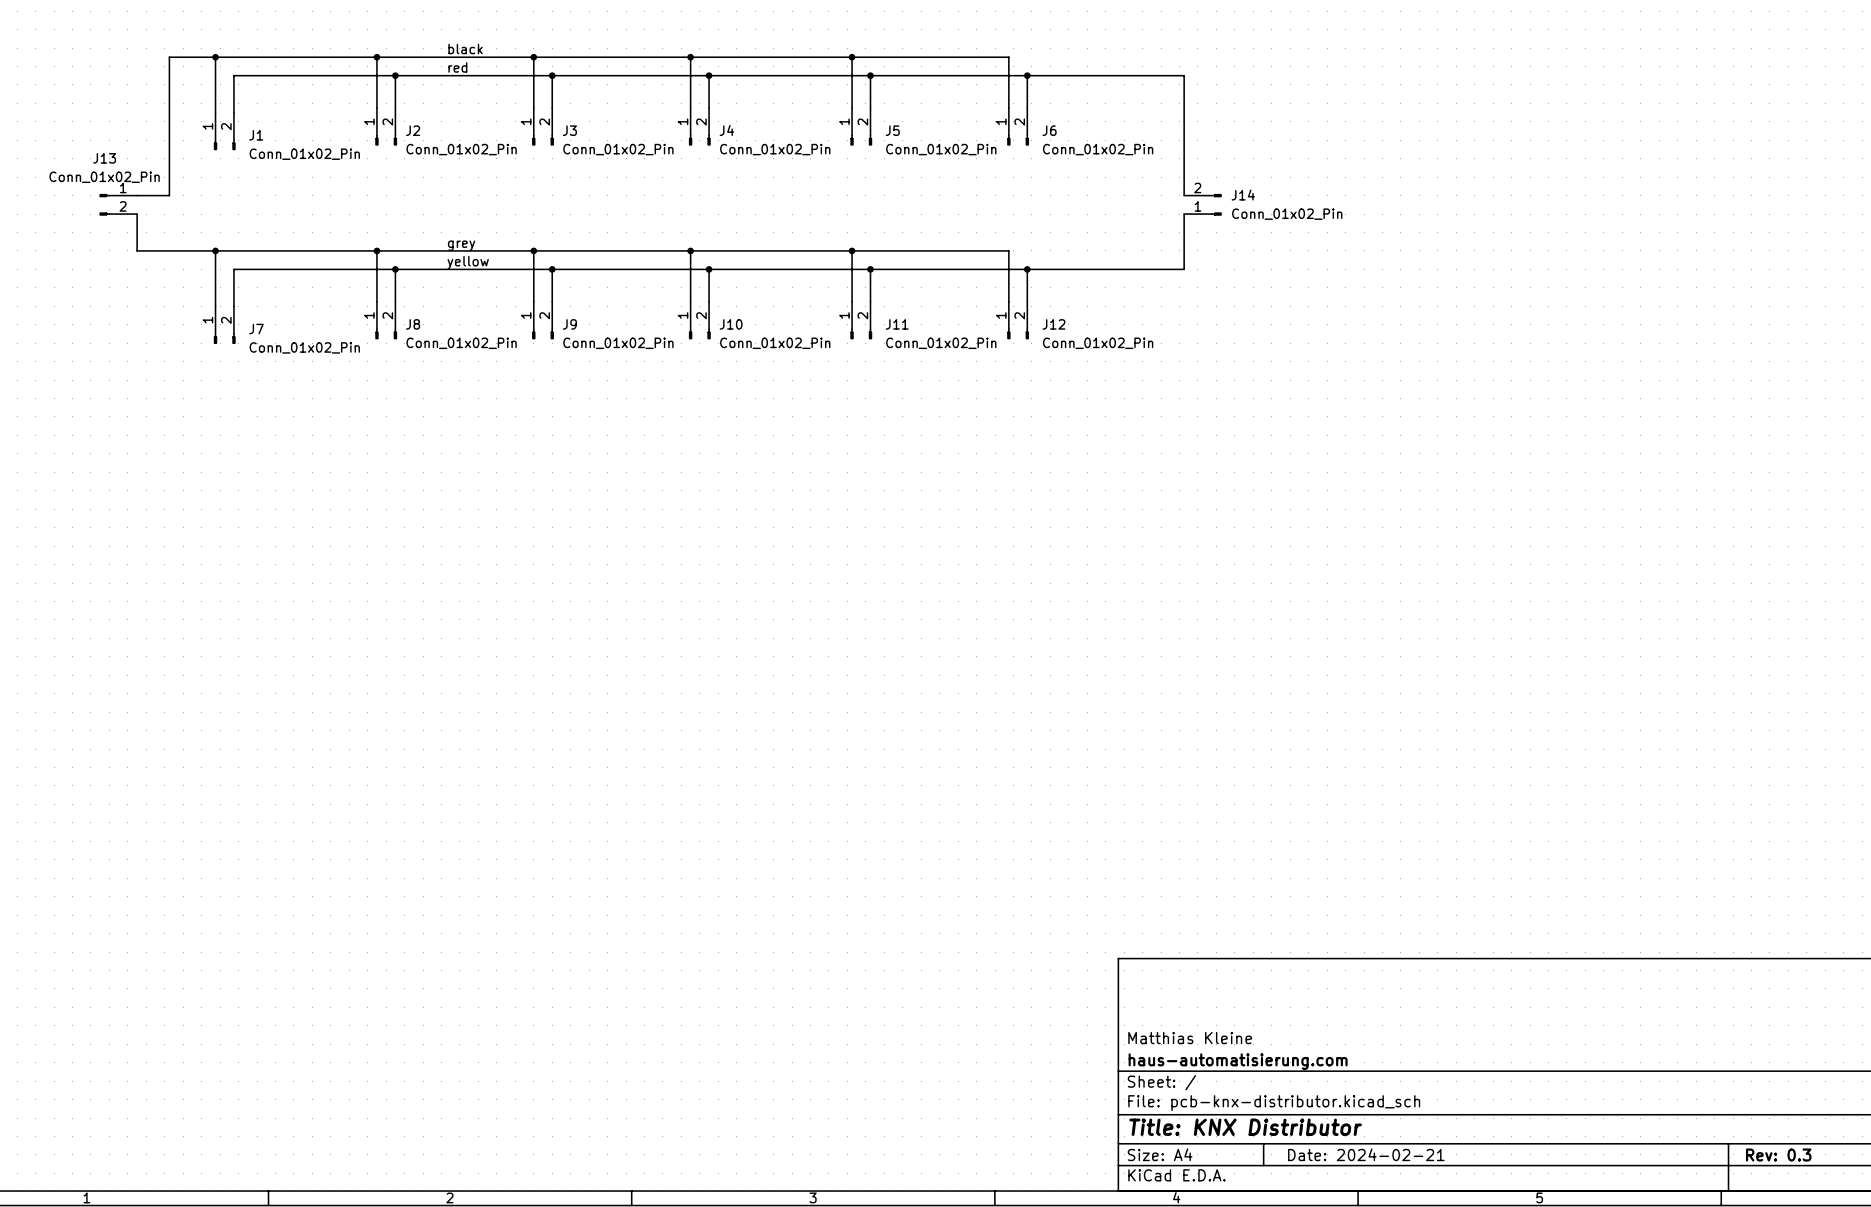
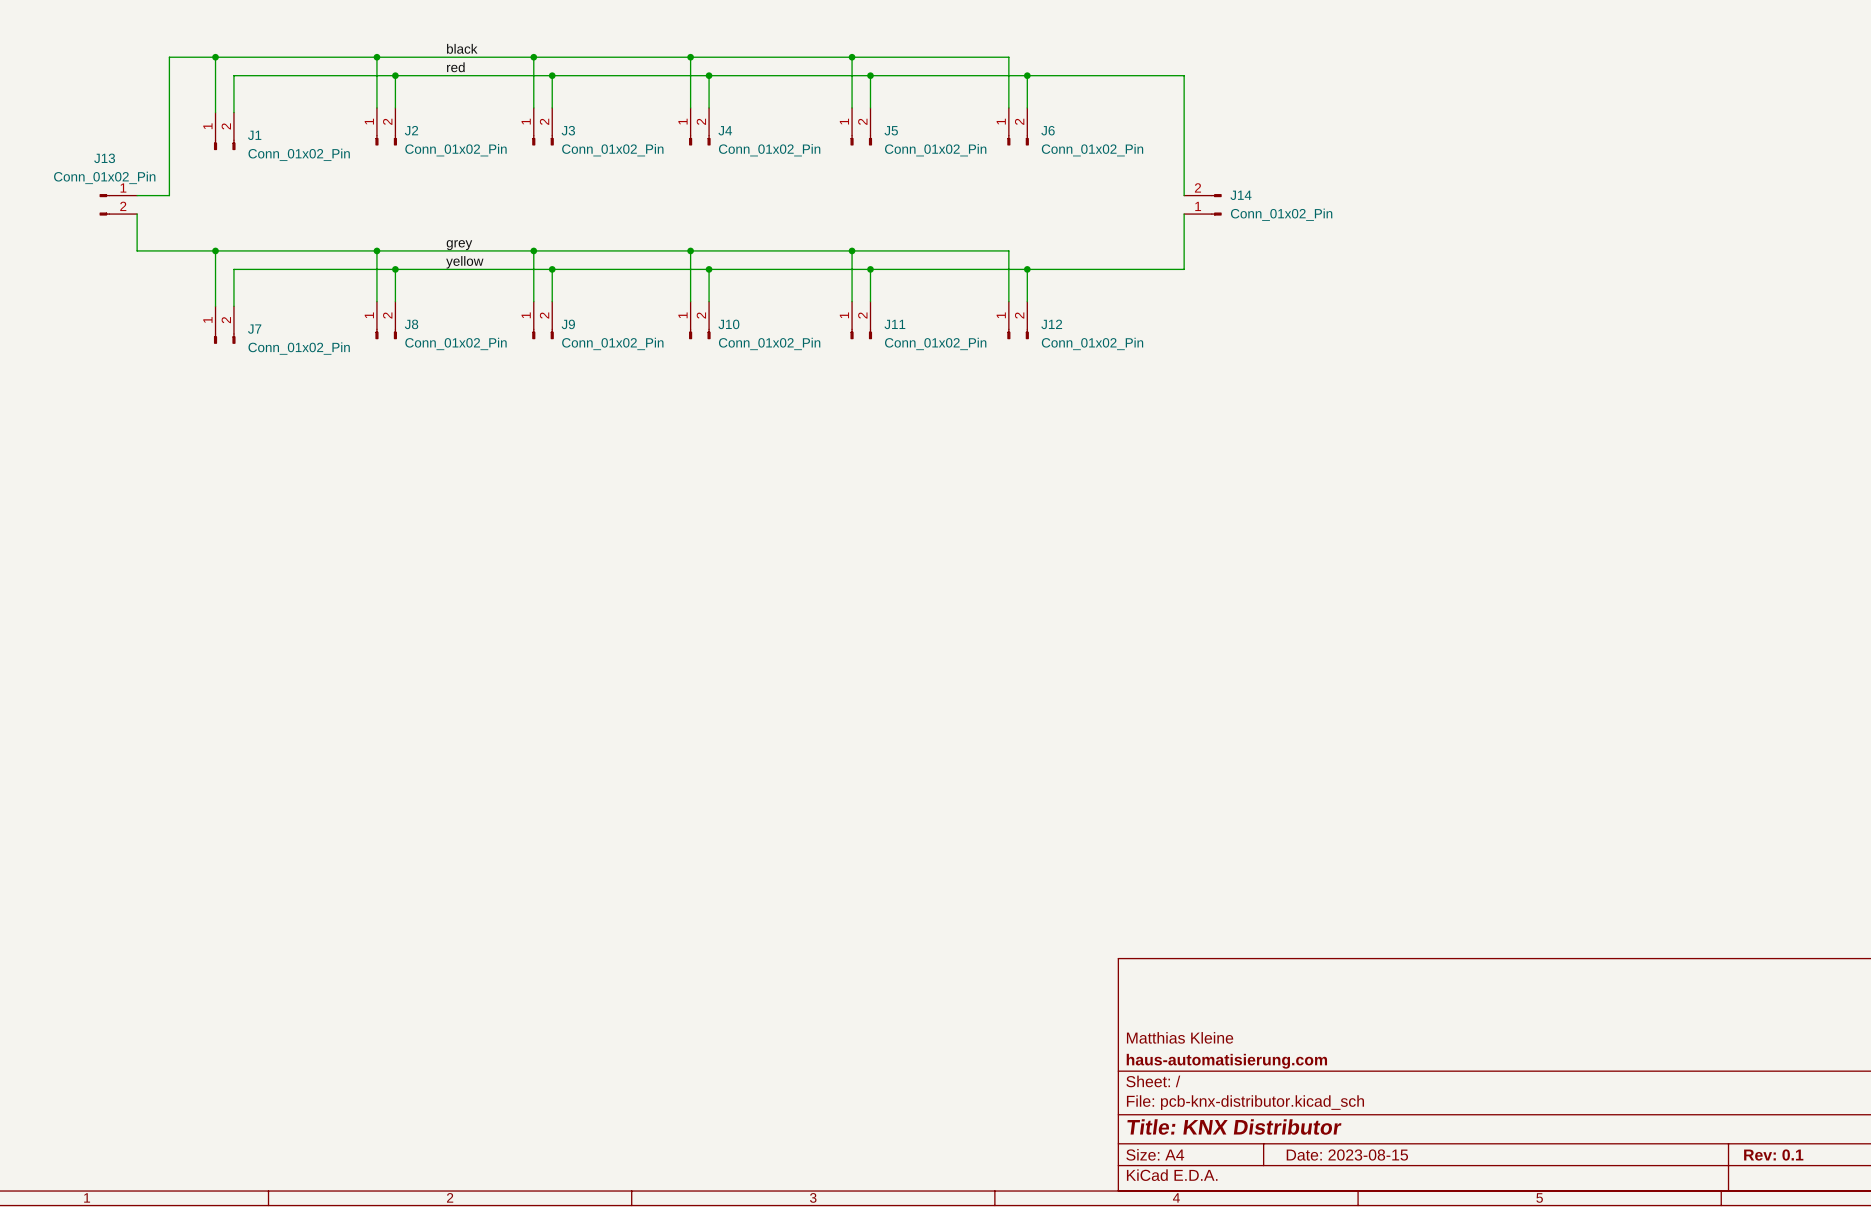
title block: Date: 2024-02-21 (1366, 1154) -> Date: 2023-08-15 (1347, 1155)
title block: Rev: 0.3 (1778, 1155) -> Rev: 0.1 (1773, 1155)

